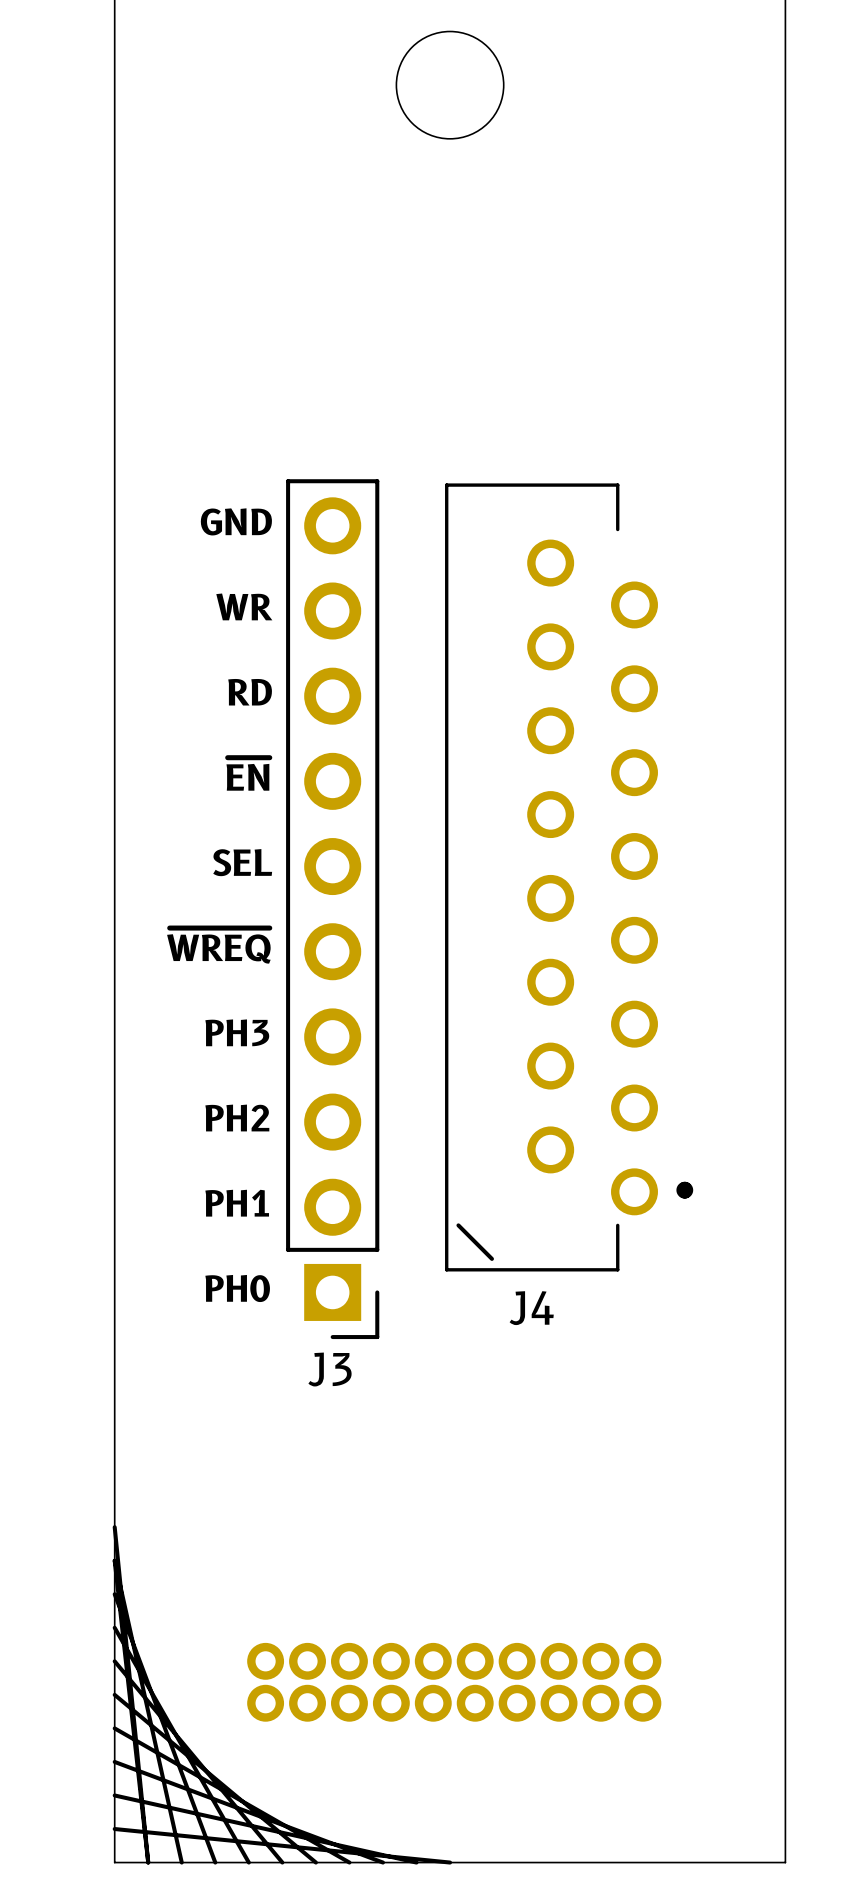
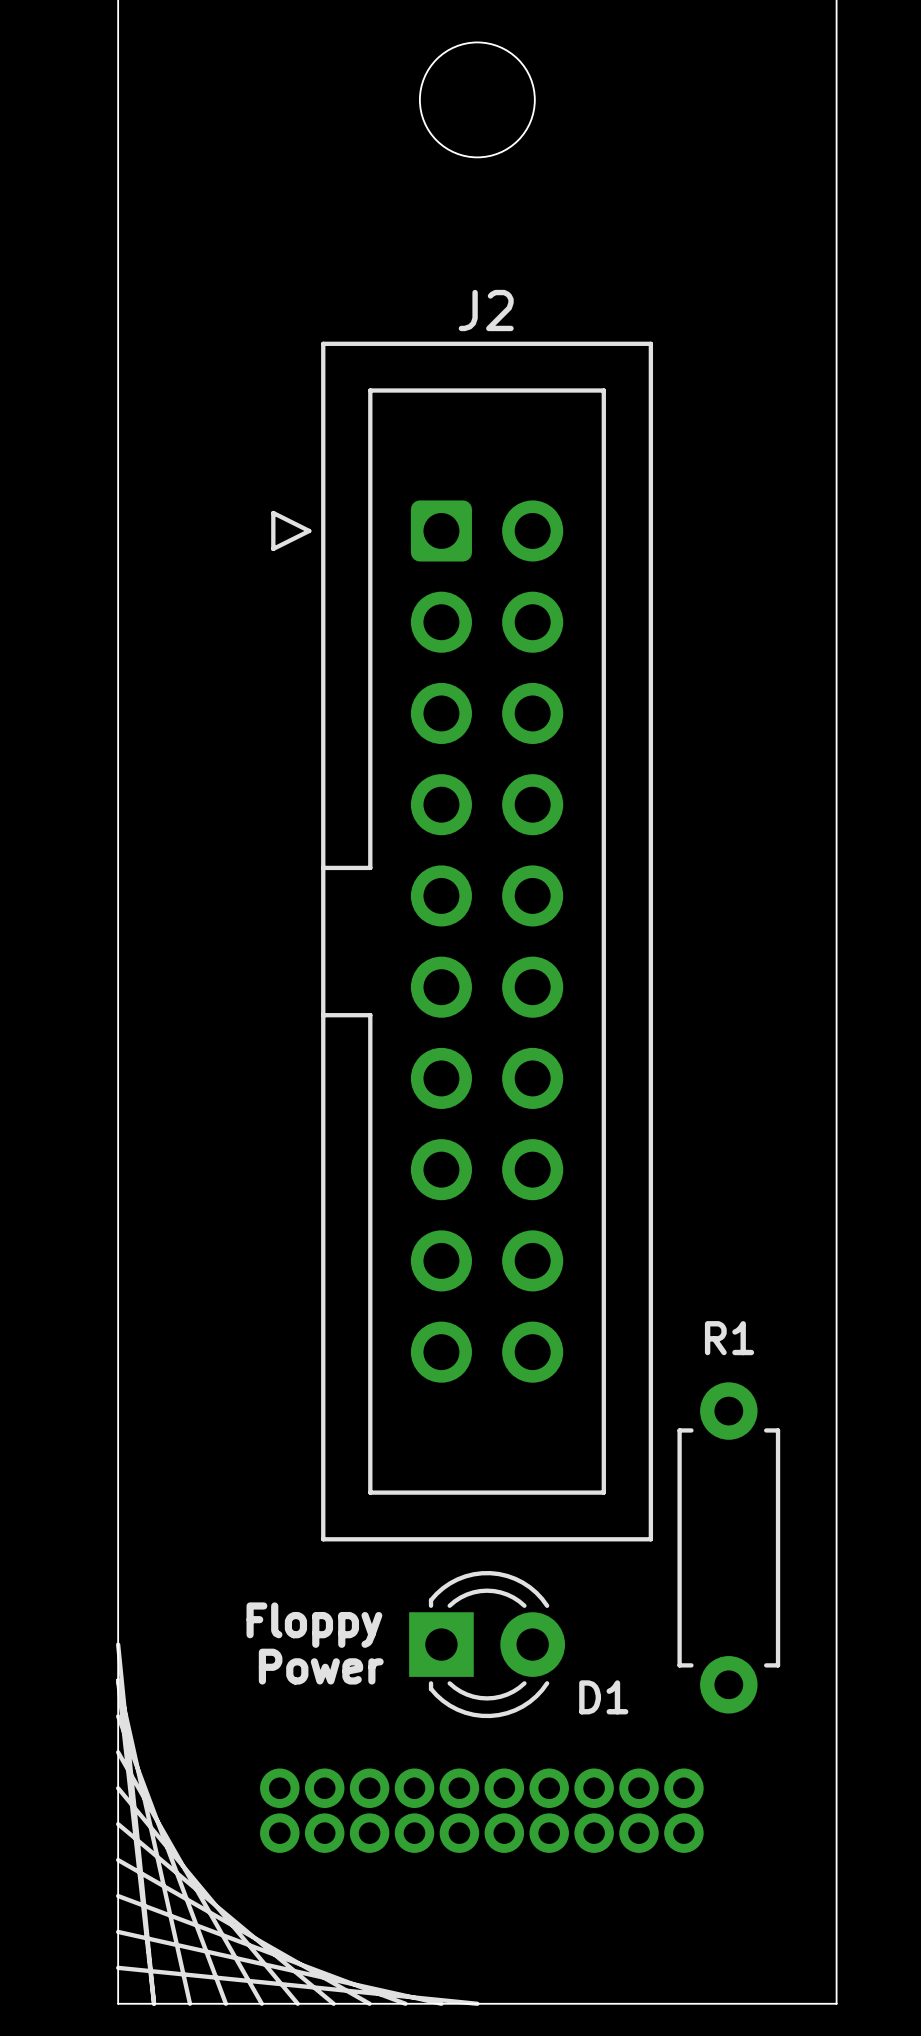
text: GND (236, 521) -> none
text: WR (244, 606) -> none
text: RD (250, 692) -> none
text: ~{EN} (248, 774) -> none
text: SEL (242, 862) -> none
J2: none -> (462, 941)
J4: (569, 877) -> none
J3: (332, 909) -> none
text: ~{WREQ} (218, 945) -> none
text: PH3 (237, 1032) -> none
text: PH2 (237, 1118) -> none
text: PH1 (237, 1203) -> none
line: (458, 1225) (491, 1258) -> none
text: PH0 (237, 1288) -> none
R1: none -> (728, 1547)
text: none -> Floppy (314, 1625)
D1: none -> (487, 1644)
text: none -> Power (321, 1666)

